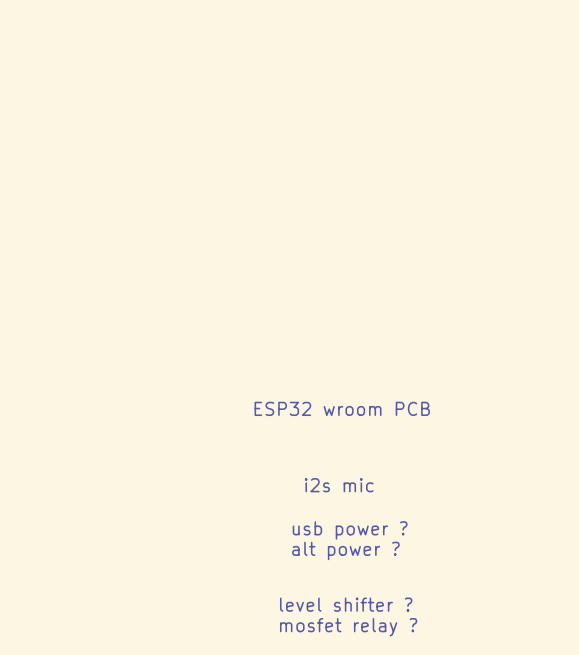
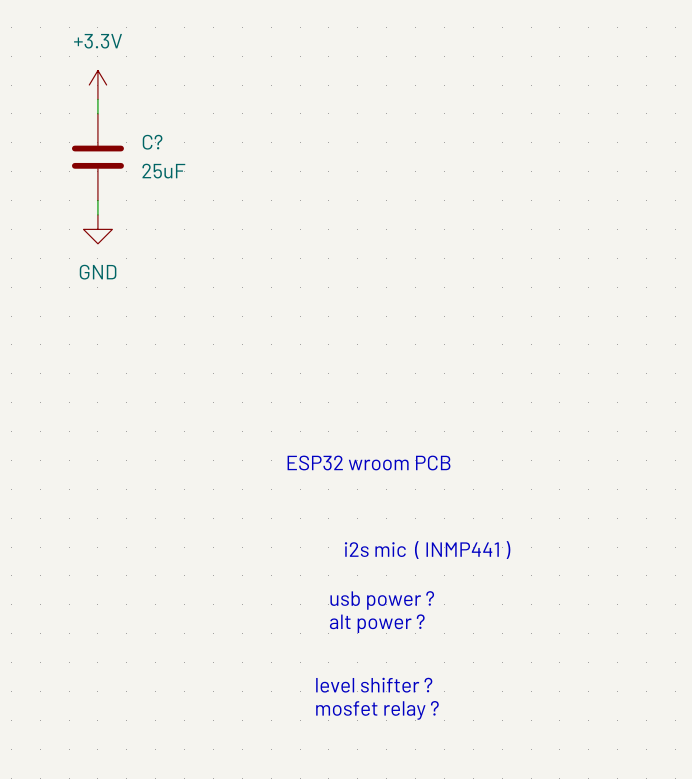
power symbol: none -> +3.3V (97, 85)
wire: none -> (97, 99) (97, 113)
C?: none -> 25uF (97, 157)
wire: none -> (97, 200) (97, 214)
power symbol: none -> GND (97, 229)
text: i2s mic (339, 485) -> i2s mic ( INMP441 ) (427, 550)

